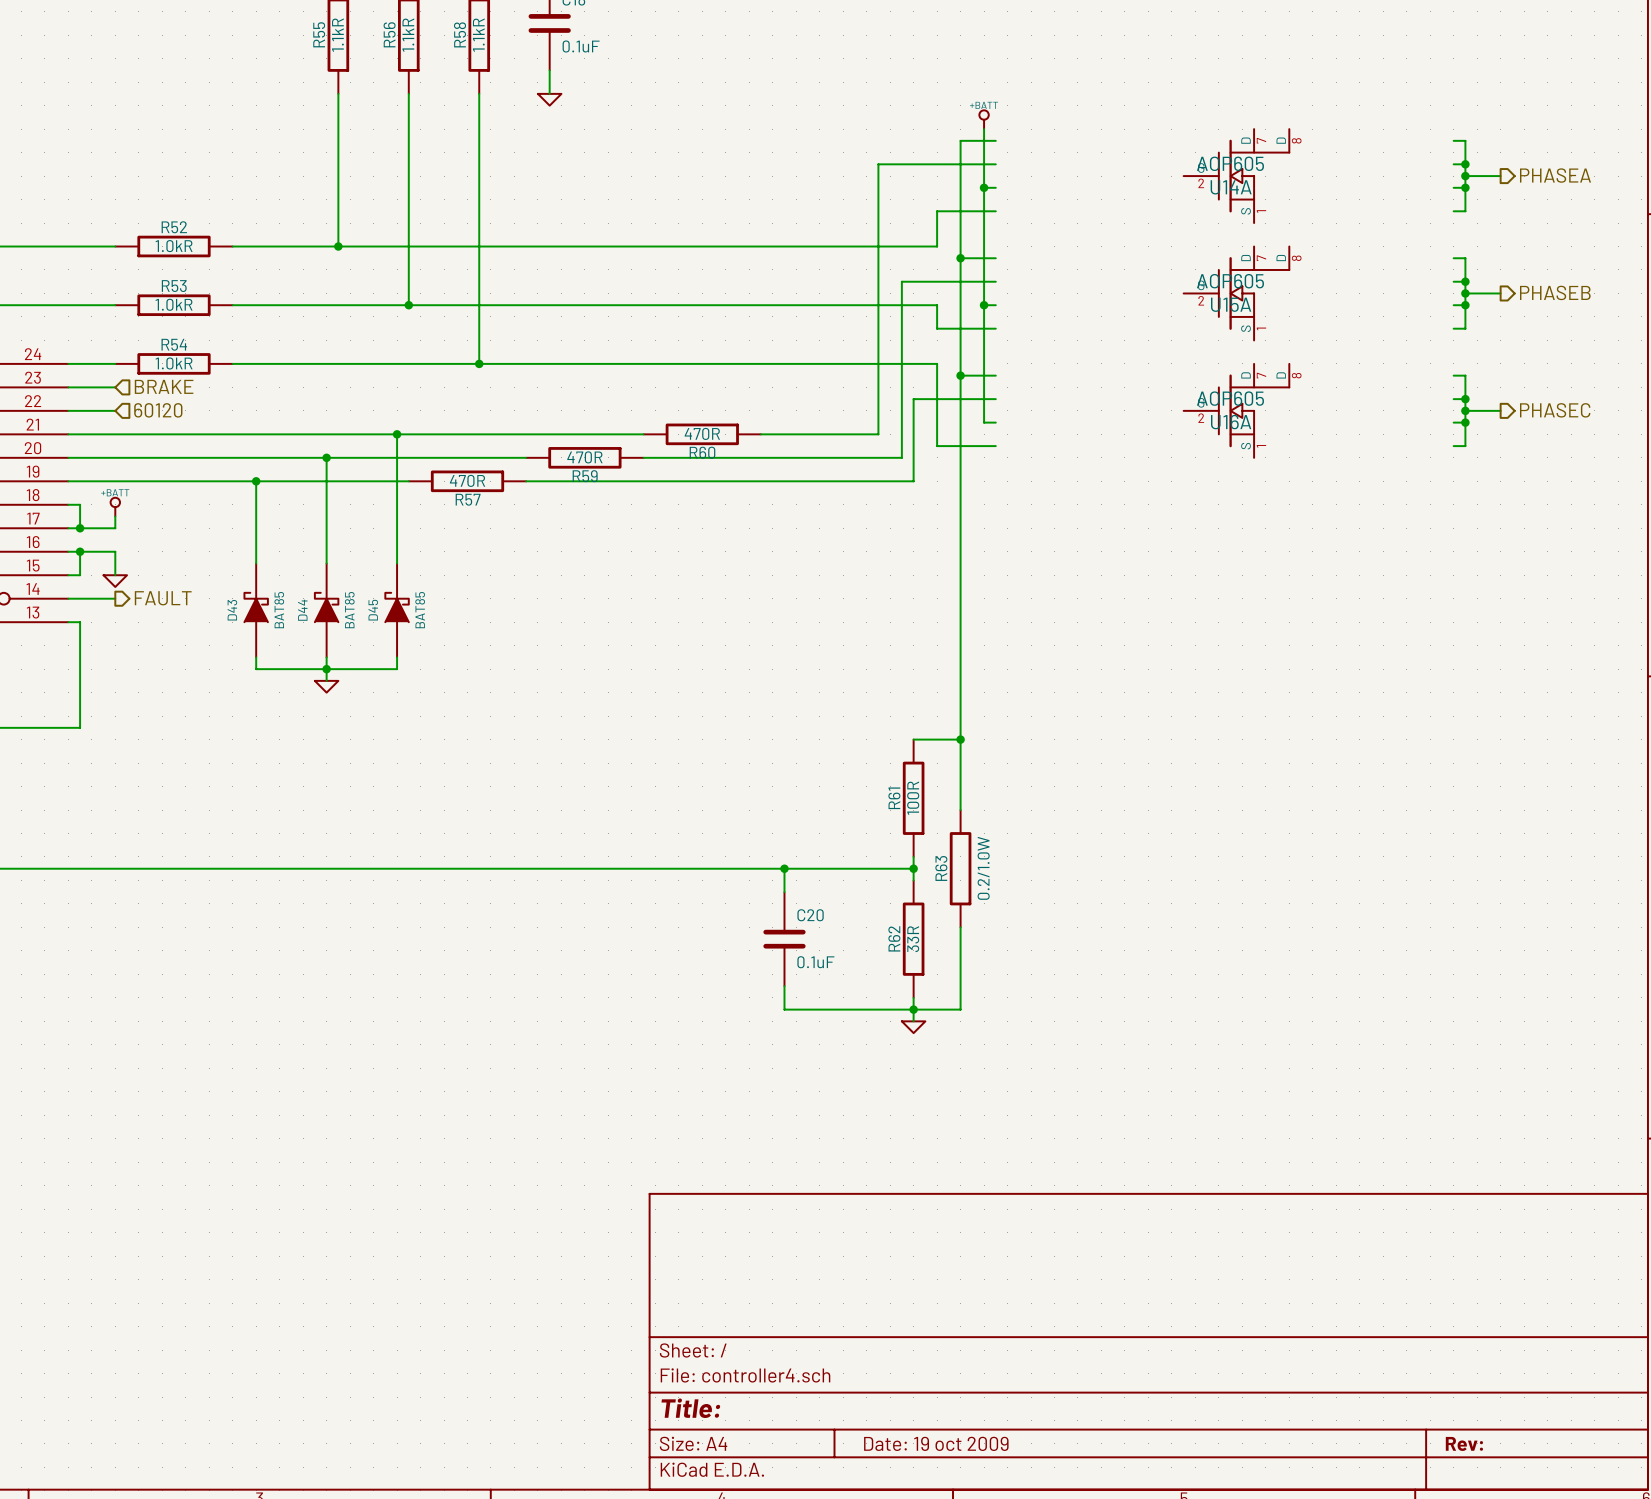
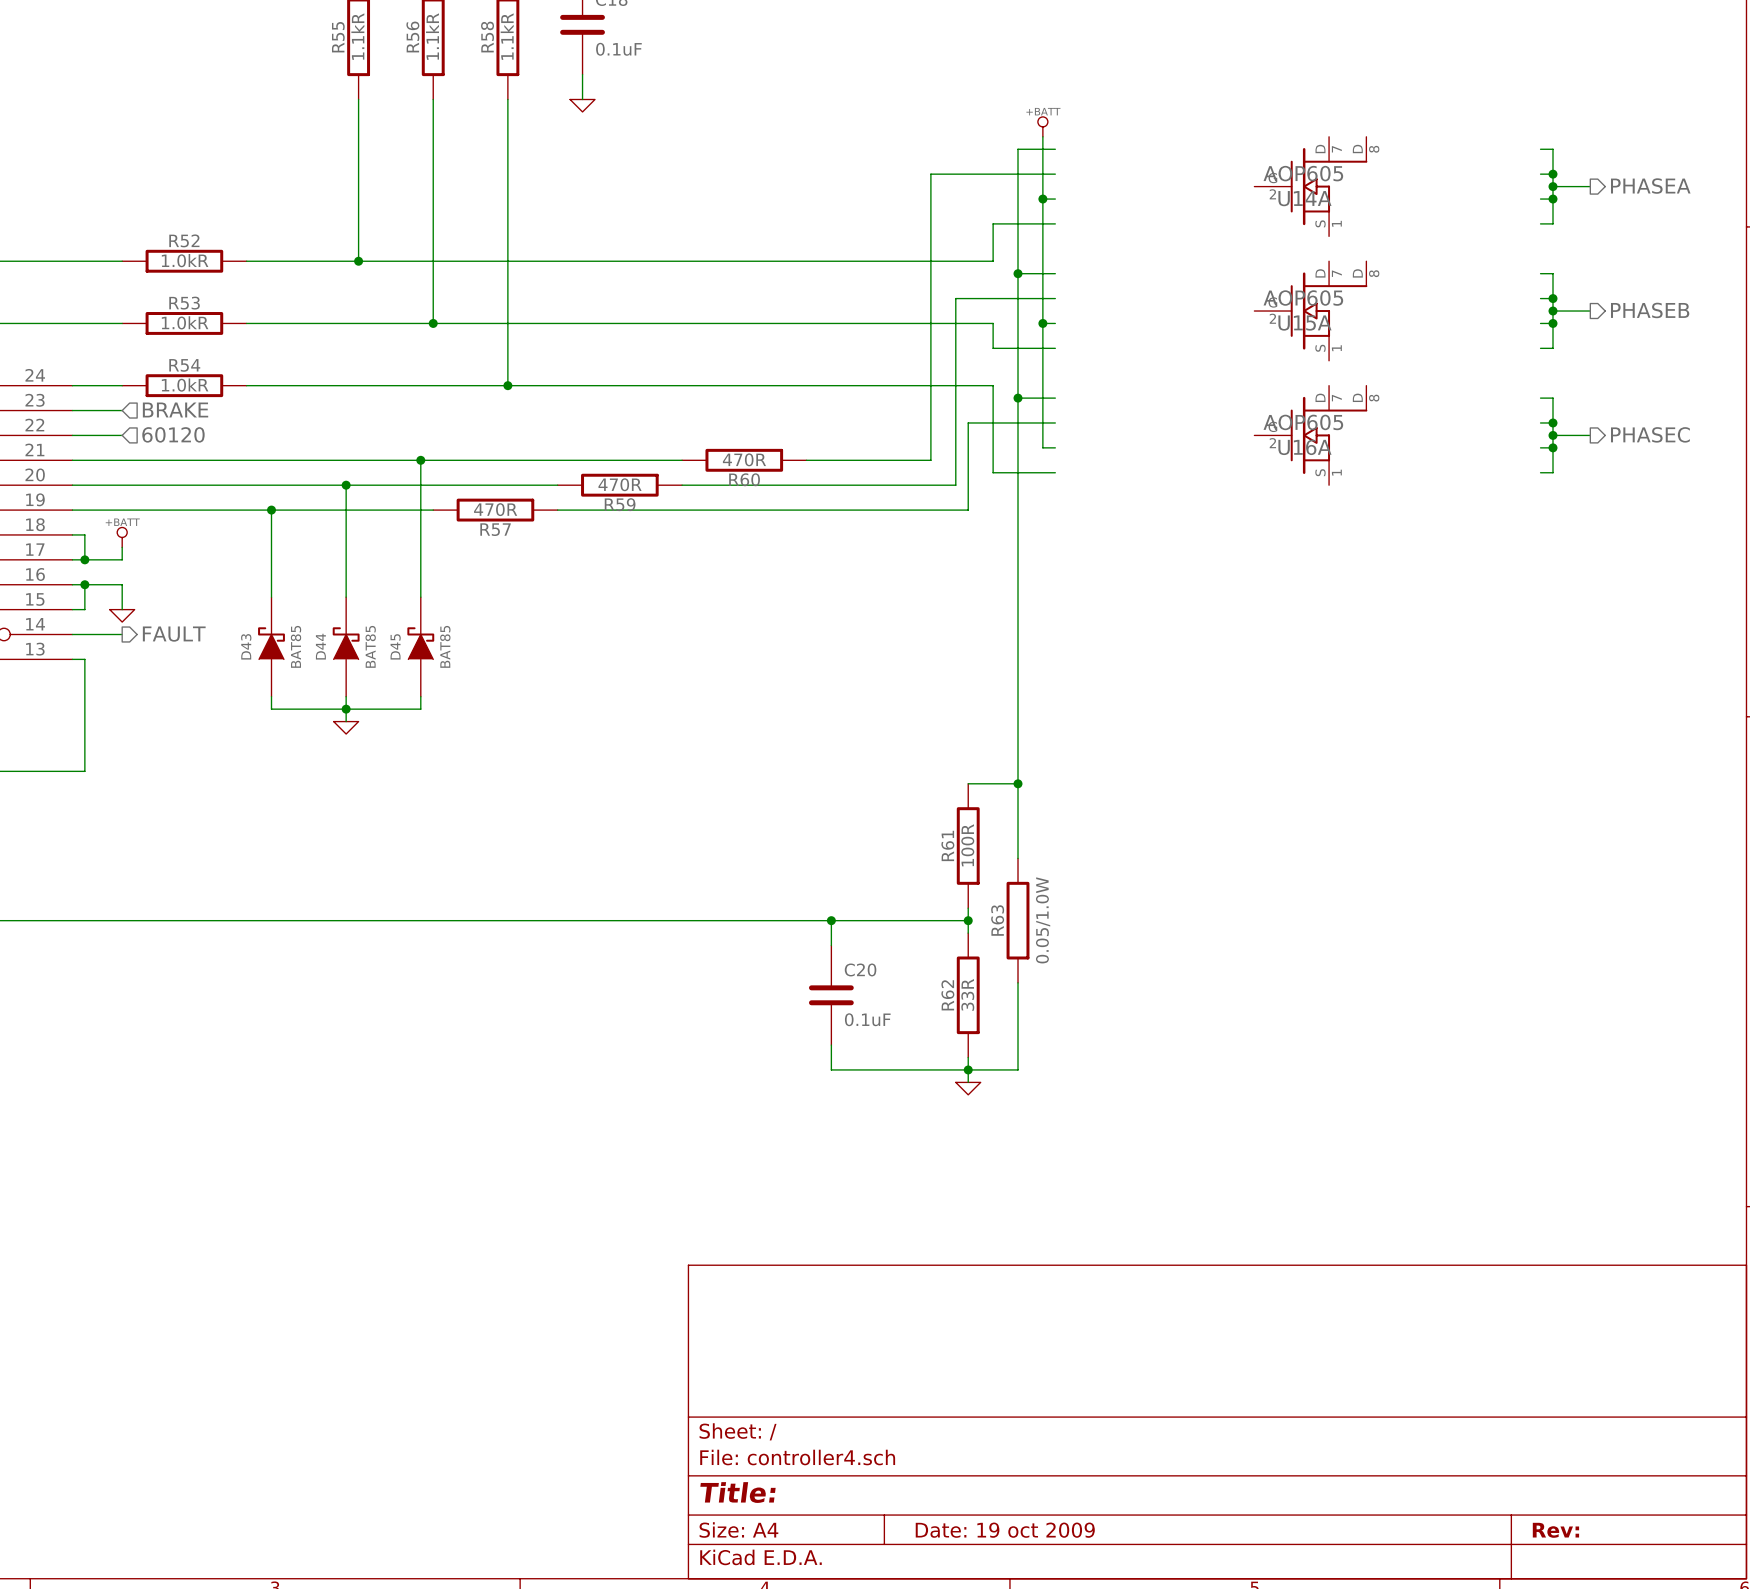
R63 value: 0.2/1.0W (983, 868) -> 0.05/1.0W (1043, 920)

